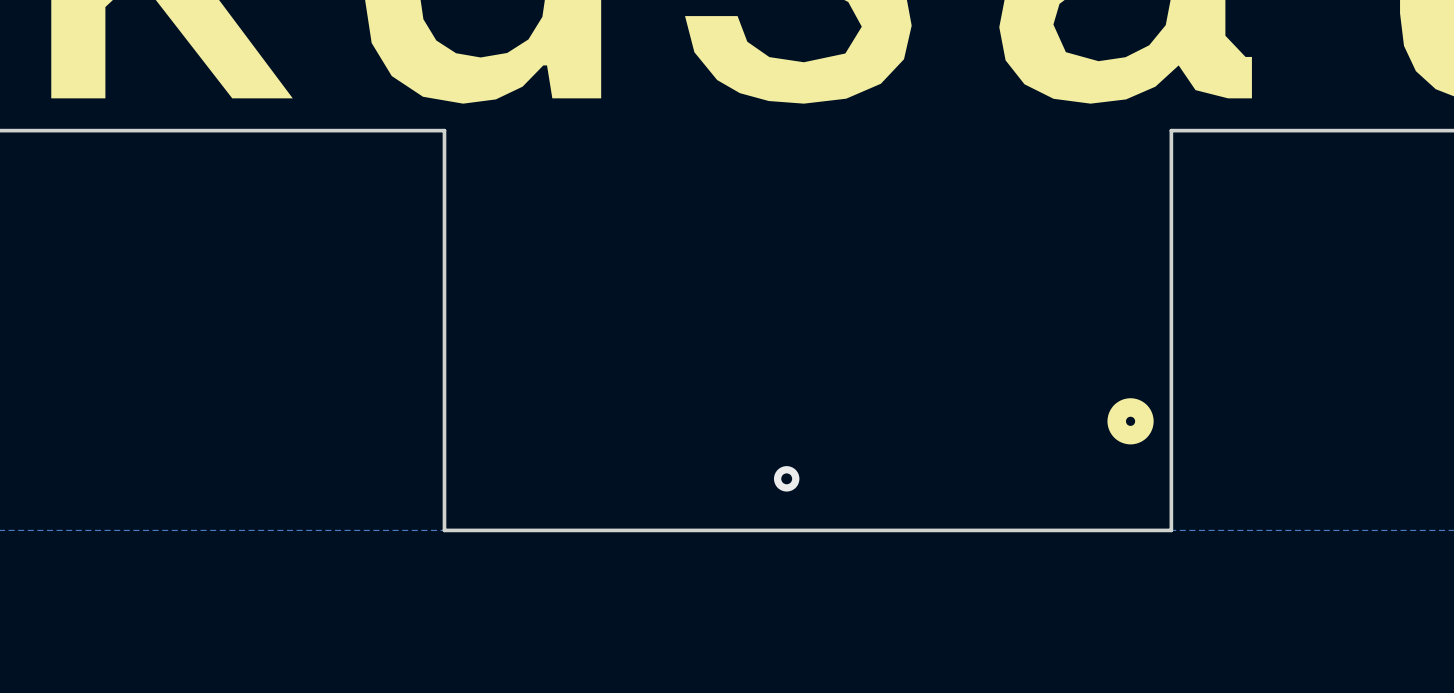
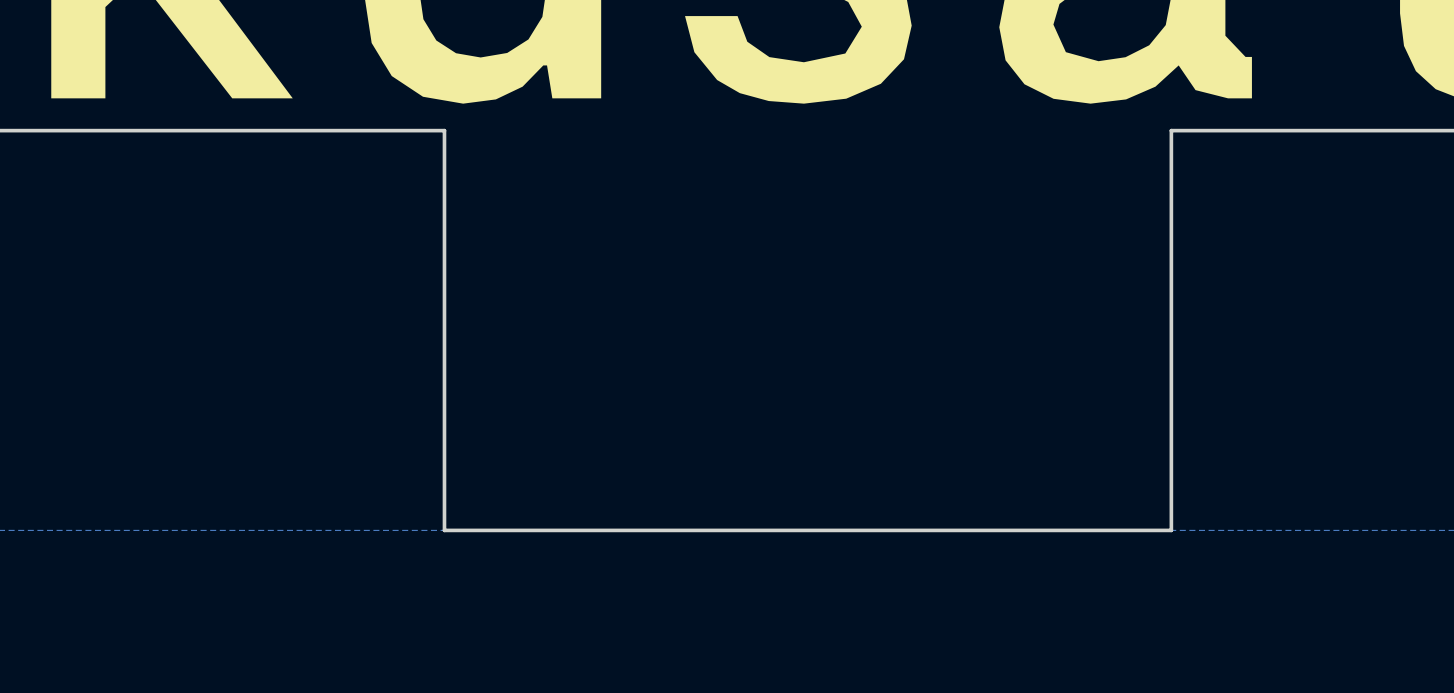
part: (1130, 421) -> none
via: (786, 478) -> none

